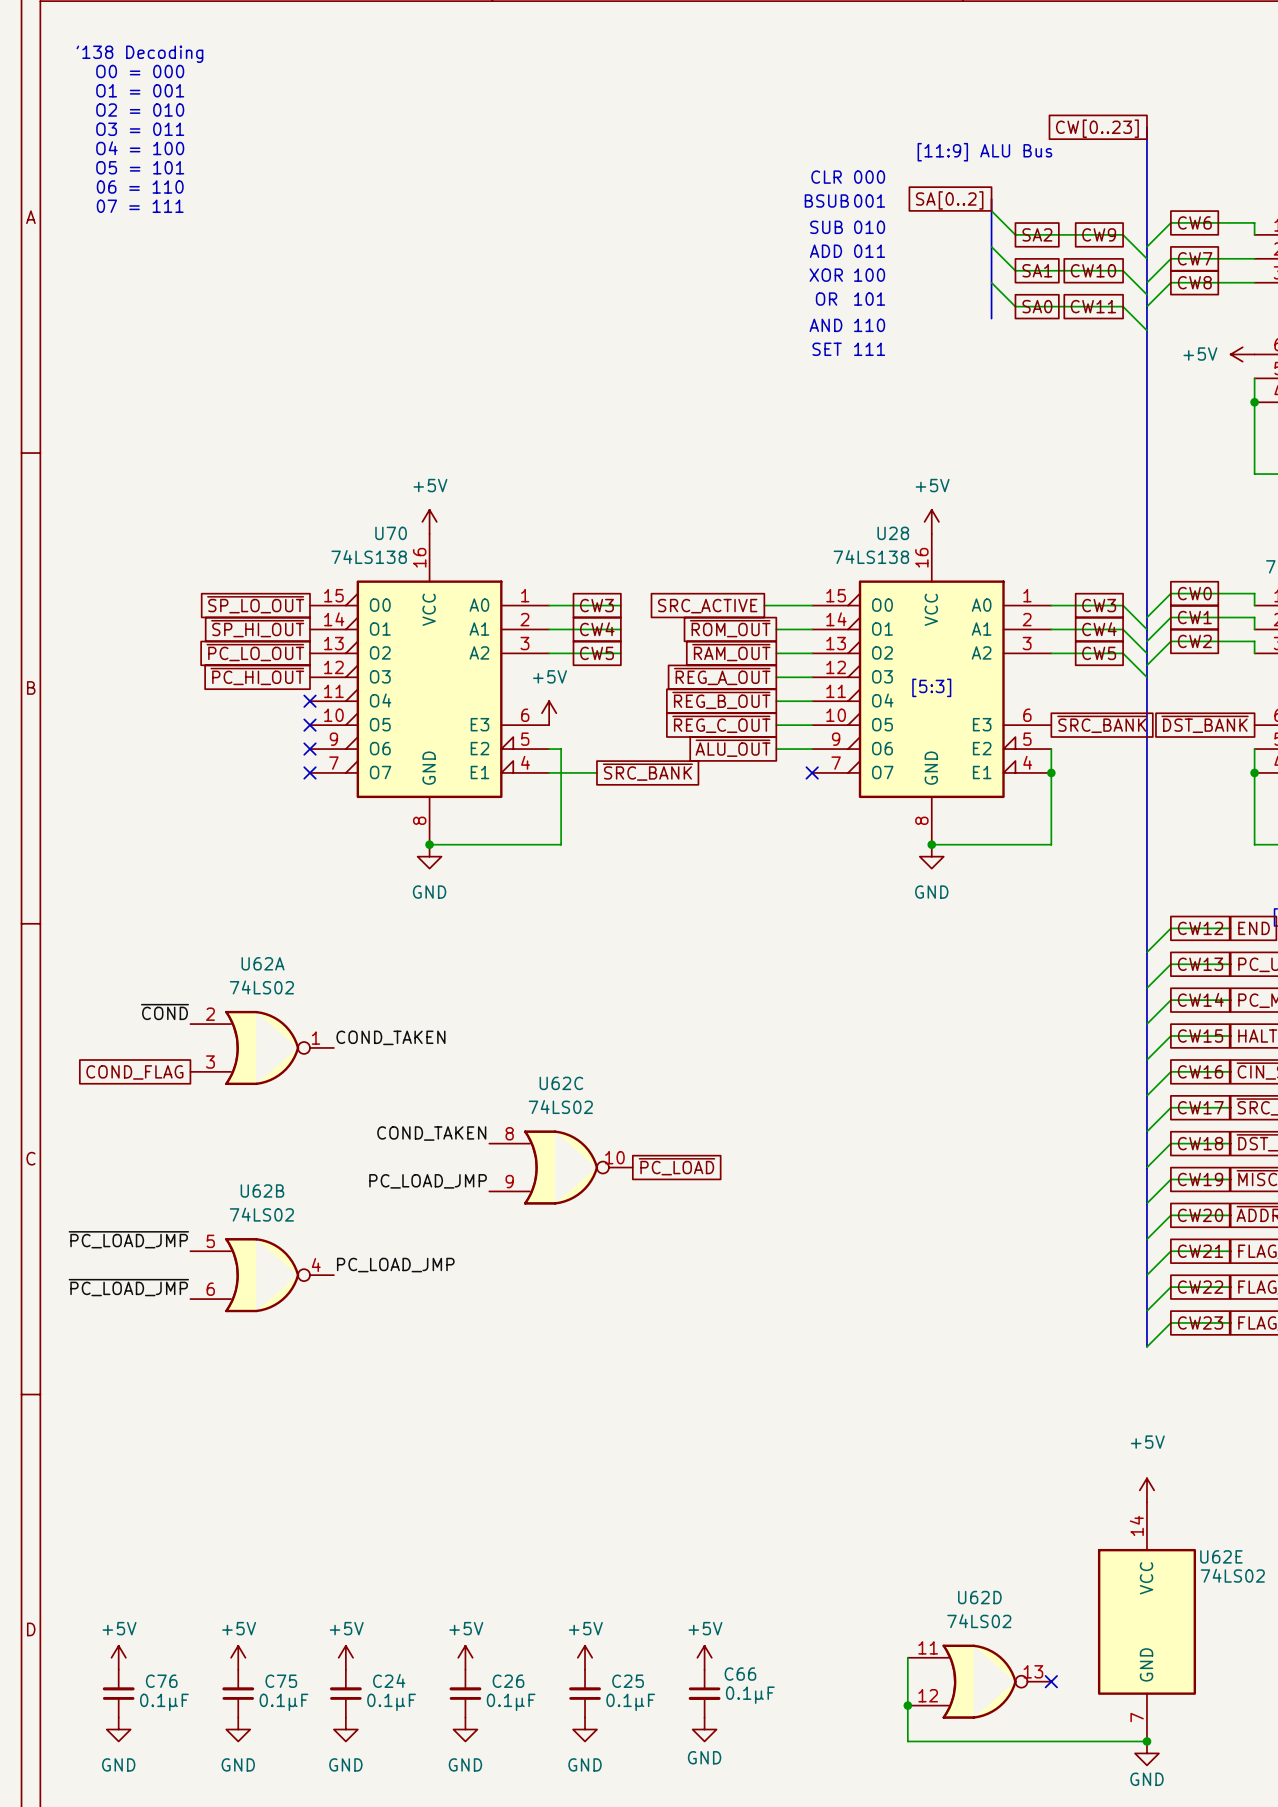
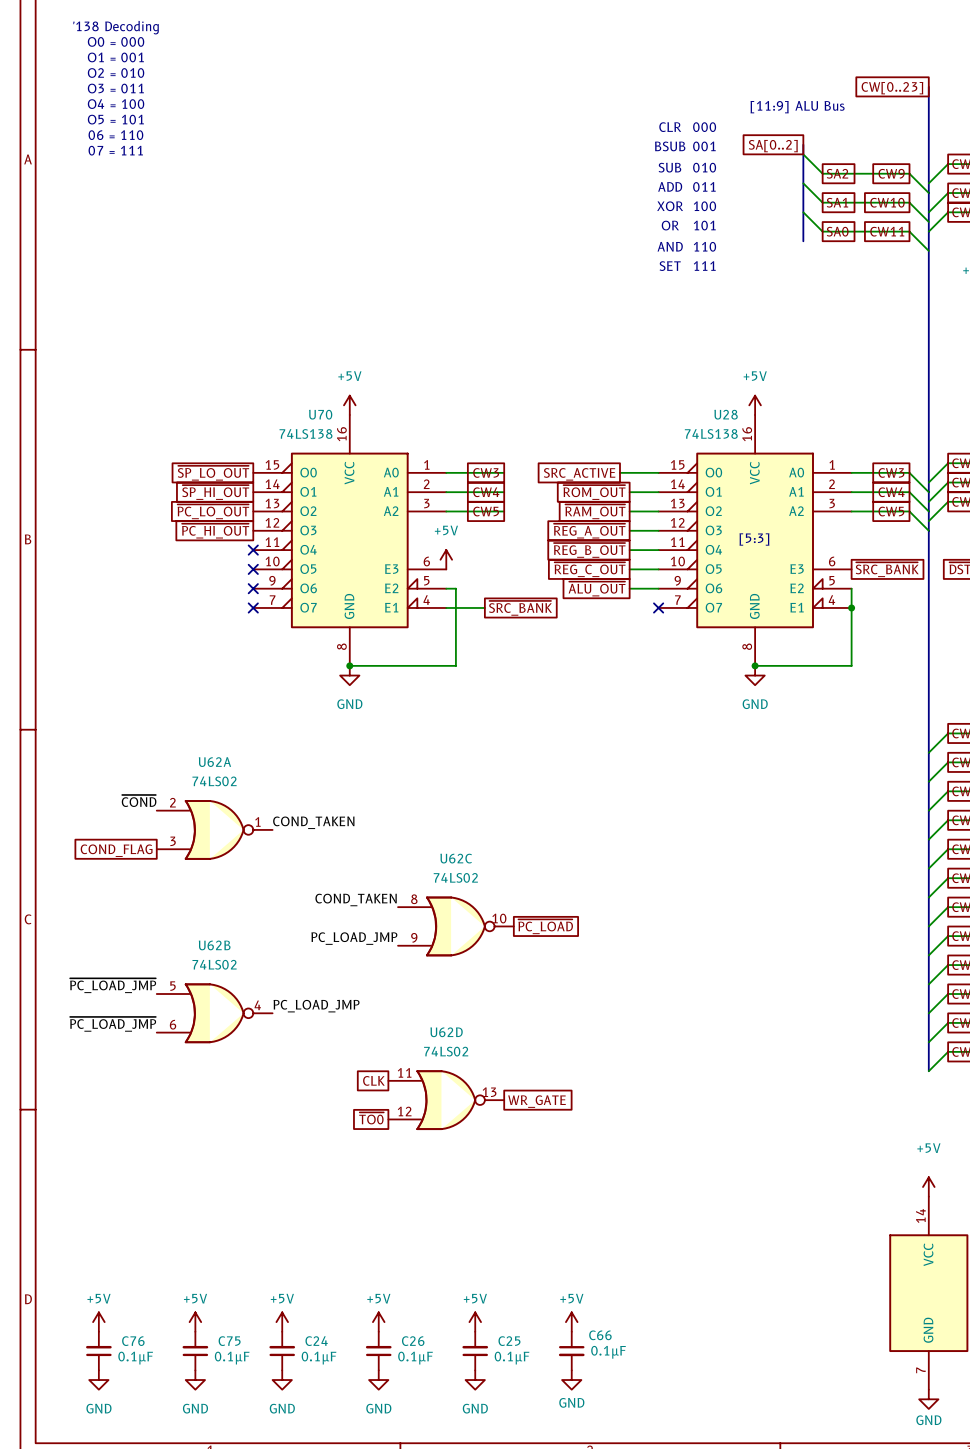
global label: none -> CLK (373, 1080)
global label: none -> WR_GATE (537, 1101)
global label: none -> ~{TO0} (371, 1118)
wire: (907, 1657) (907, 1741) (1146, 1741) -> none
U62D position: (979, 1681) -> (446, 1100)
no-connect mark: (1051, 1681) -> none
junction: (907, 1705) -> none
junction: (1146, 1741) -> none

